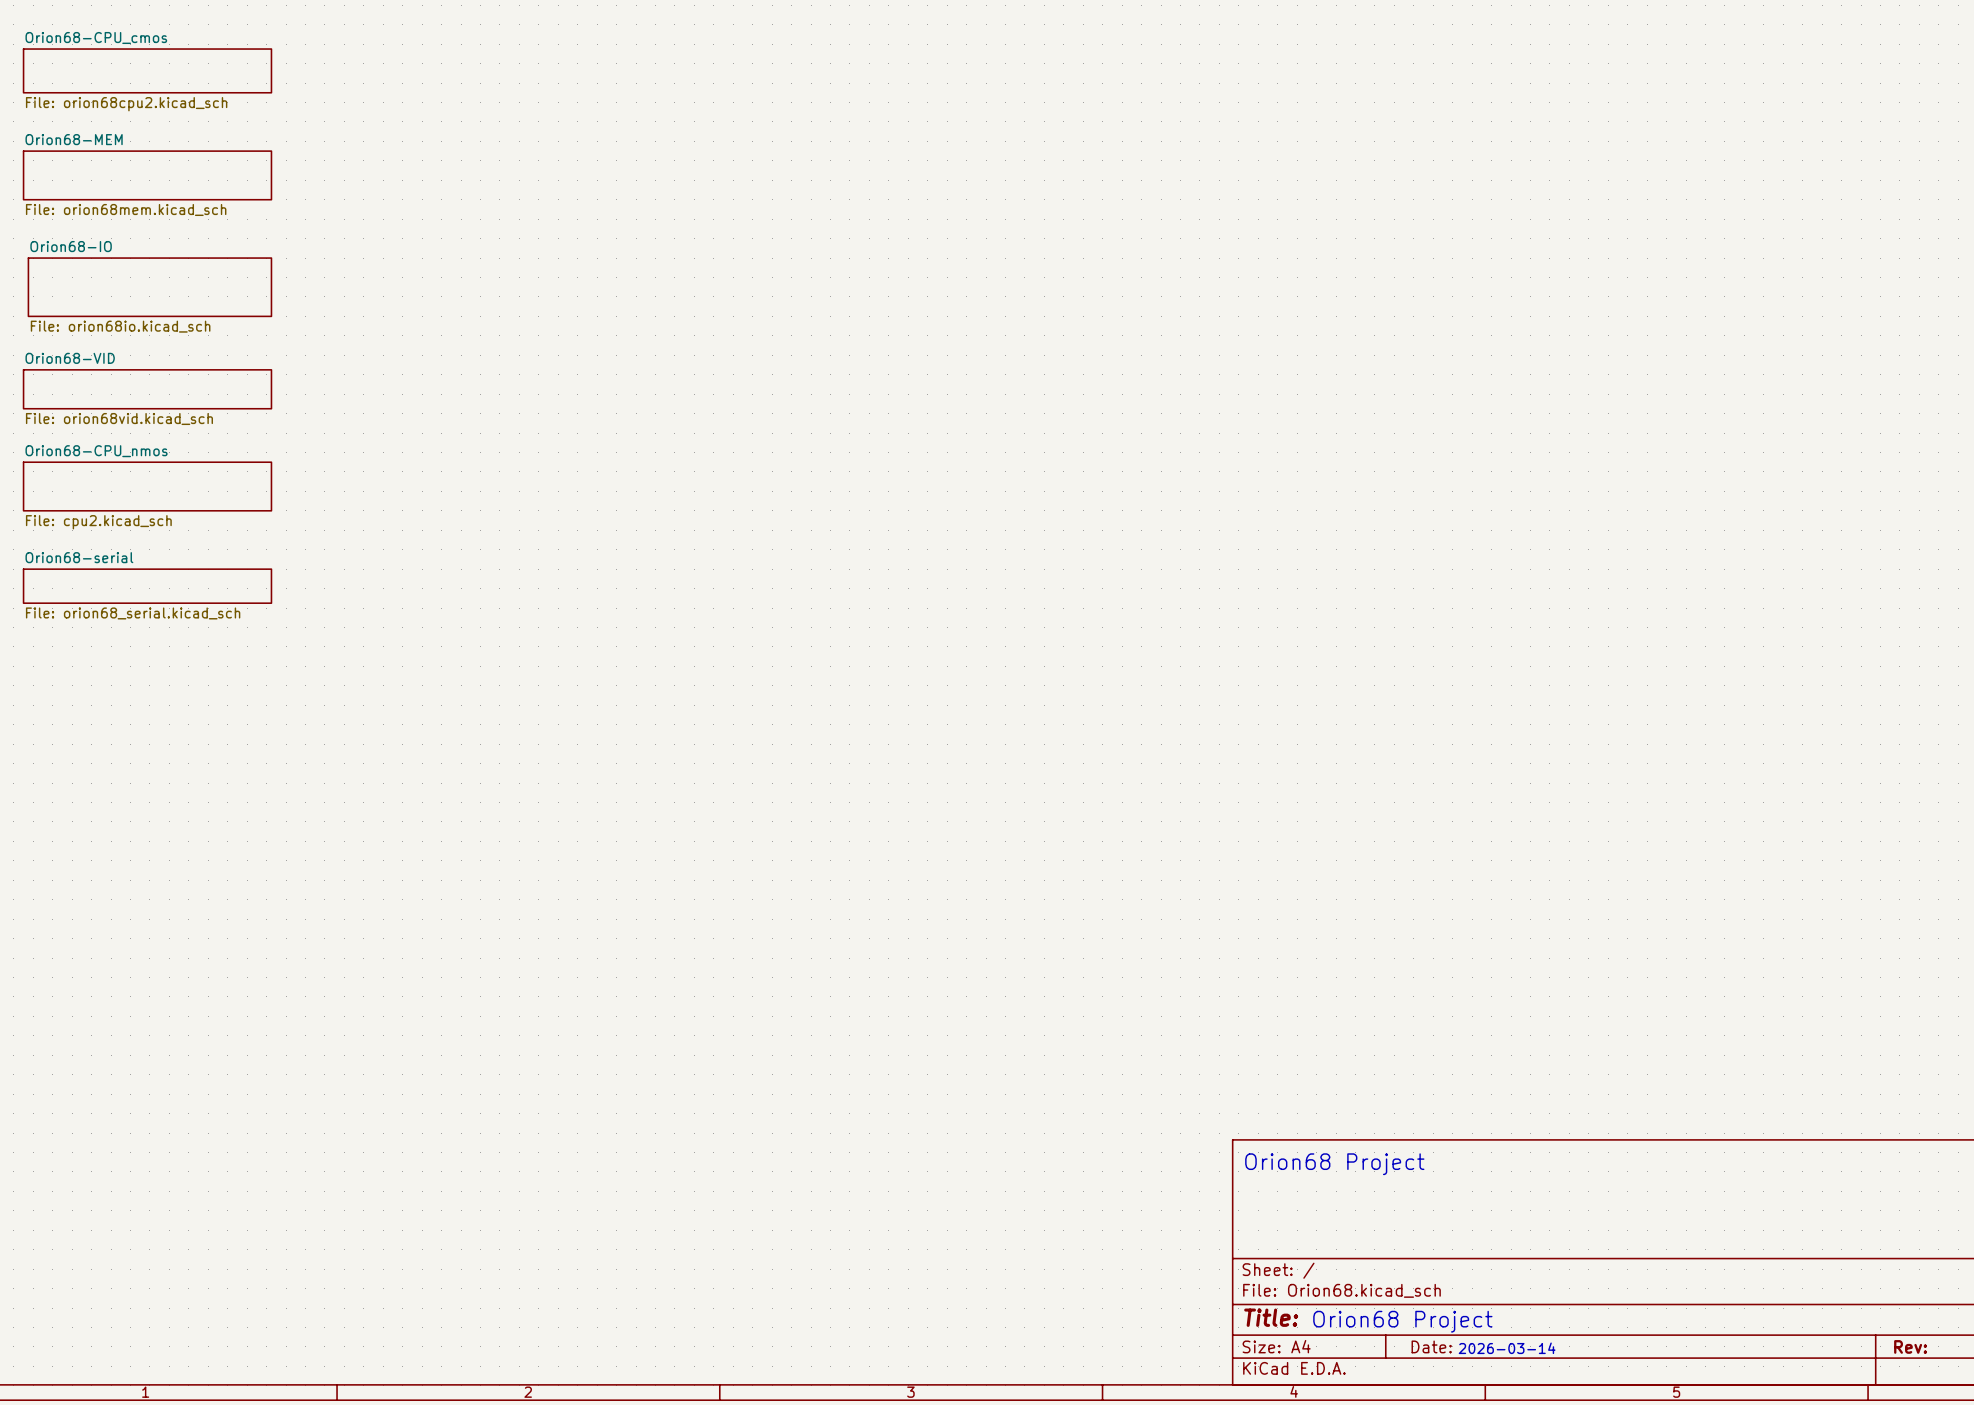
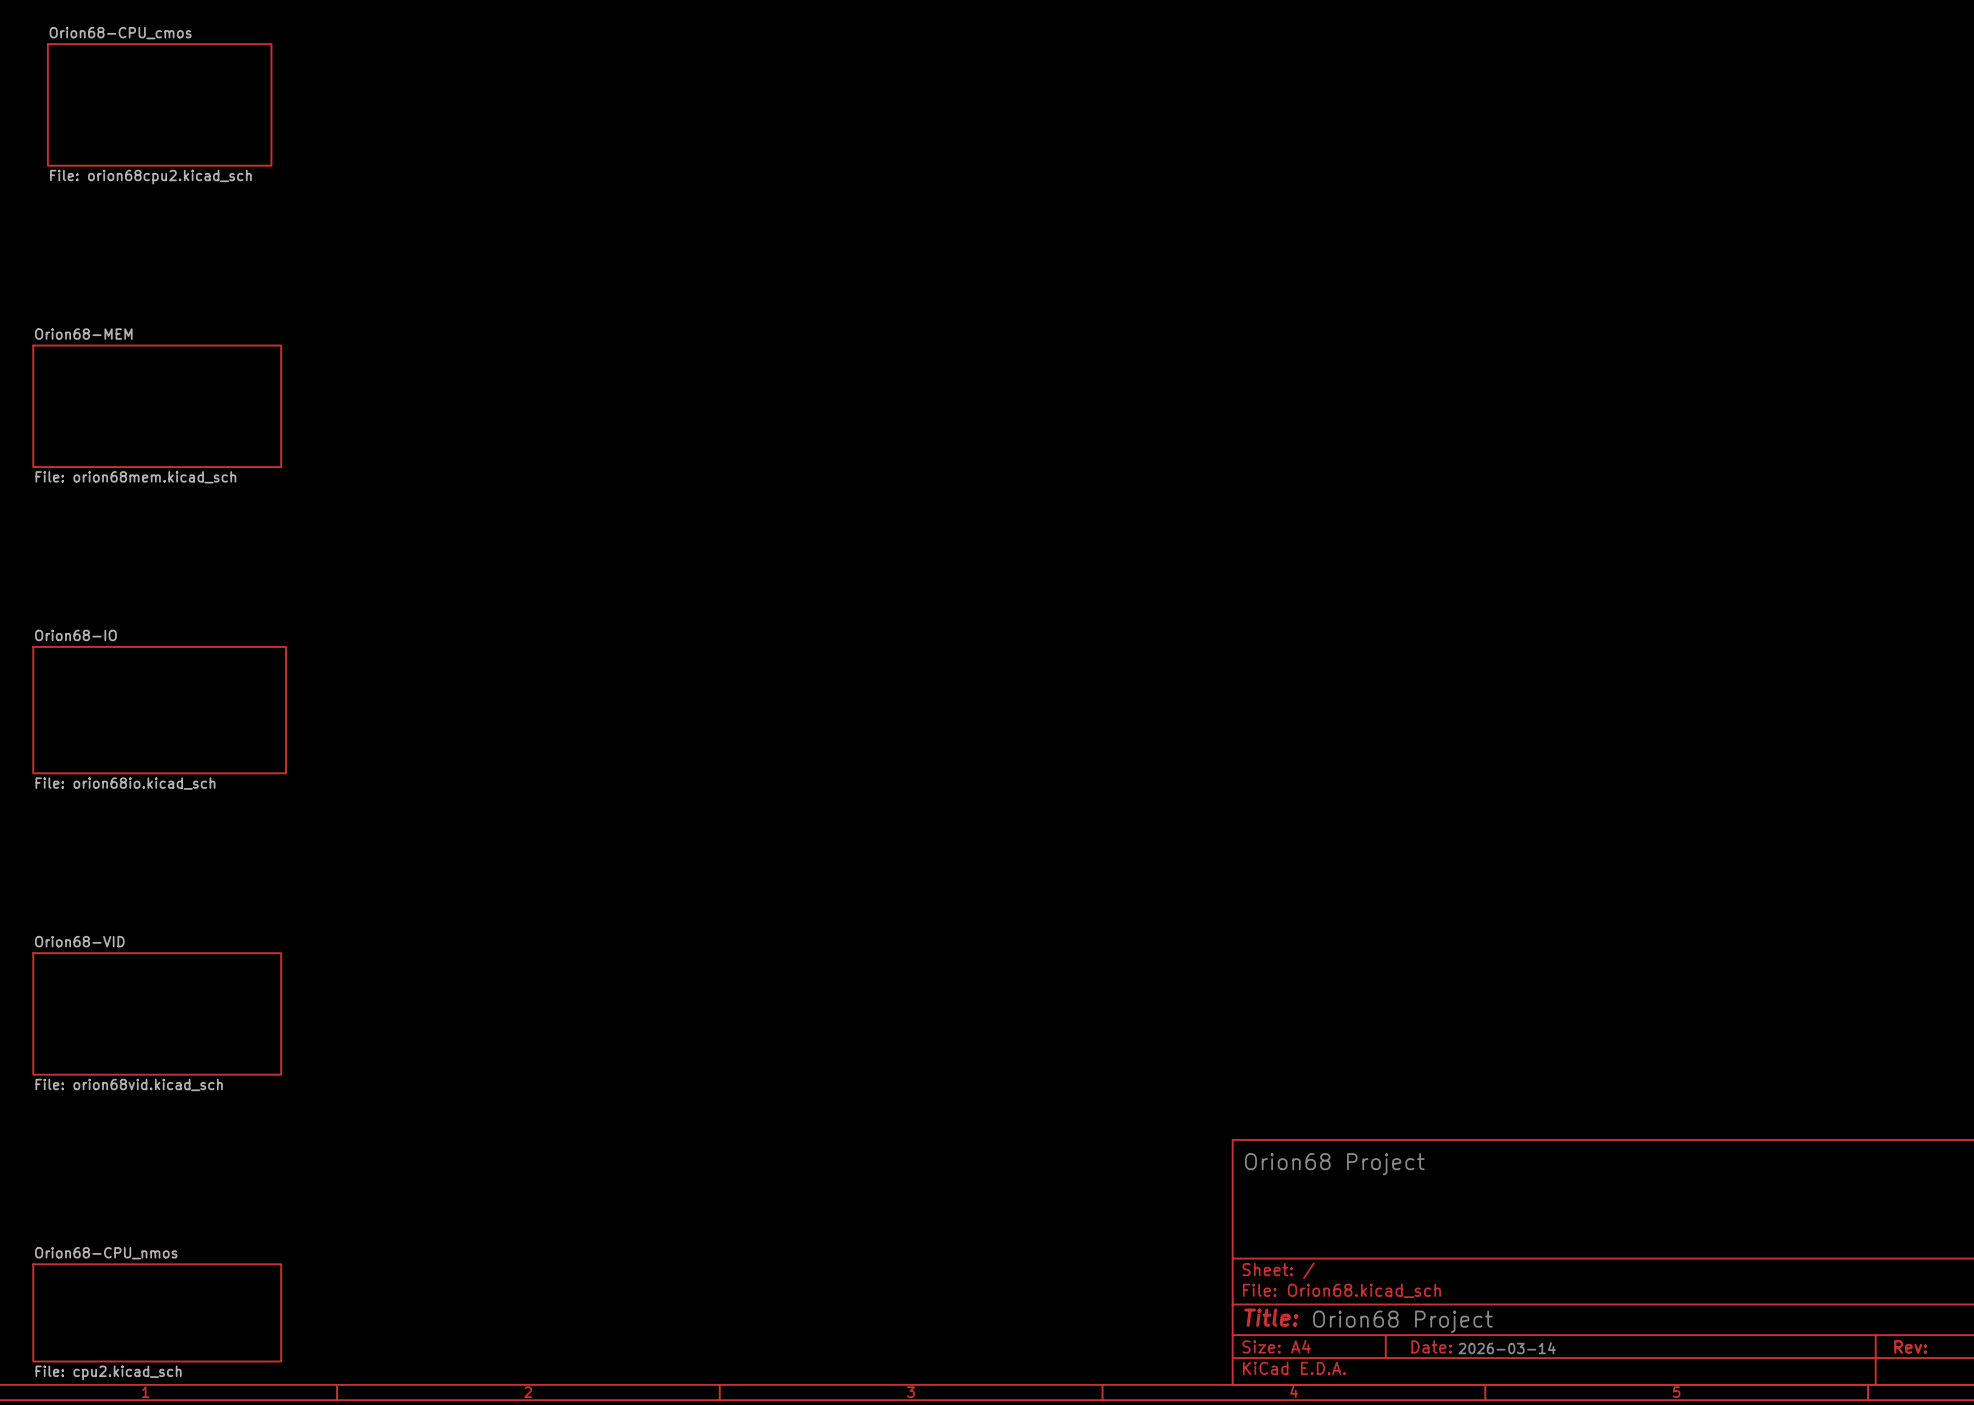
sheet Orion68-CPU_cmos name position: Orion68-CPU_cmos (96, 37) -> Orion68-CPU_cmos (120, 33)
sheet Orion68-CPU_cmos shape: [22, 48, 273, 94] -> [47, 43, 273, 167]
sheet Orion68-CPU_cmos value position: File: orion68cpu2.kicad_sch (126, 104) -> File: orion68cpu2.kicad_sch (150, 177)
sheet Orion68-MEM name position: Orion68-MEM (74, 139) -> Orion68-MEM (83, 334)
sheet Orion68-MEM shape: [22, 150, 273, 201] -> [32, 344, 282, 468]
sheet Orion68-MEM value position: File: orion68mem.kicad_sch (126, 209) -> File: orion68mem.kicad_sch (135, 477)
sheet Orion68-IO name position: Orion68-IO (71, 246) -> Orion68-IO (75, 635)
sheet Orion68-IO shape: [27, 257, 273, 317] -> [32, 646, 287, 774]
sheet Orion68-IO value position: File: orion68io.kicad_sch (120, 326) -> File: orion68io.kicad_sch (125, 783)
sheet Orion68-VID name position: Orion68-VID (70, 358) -> Orion68-VID (79, 941)
sheet Orion68-VID shape: [22, 369, 273, 410] -> [32, 952, 282, 1076]
sheet Orion68-VID value position: File: orion68vid.kicad_sch (119, 419) -> File: orion68vid.kicad_sch (129, 1084)
sheet Orion68-CPU_nmos name position: Orion68-CPU_nmos (96, 451) -> Orion68-CPU_nmos (106, 1253)
sheet Orion68-CPU_nmos shape: [22, 461, 273, 512] -> [32, 1263, 282, 1363]
sheet Orion68-CPU_nmos value position: File: cpu2.kicad_sch (98, 522) -> File: cpu2.kicad_sch (108, 1372)
sheet Orion68-serial: File: orion68_serial.kicad_sch (147, 586) -> none

